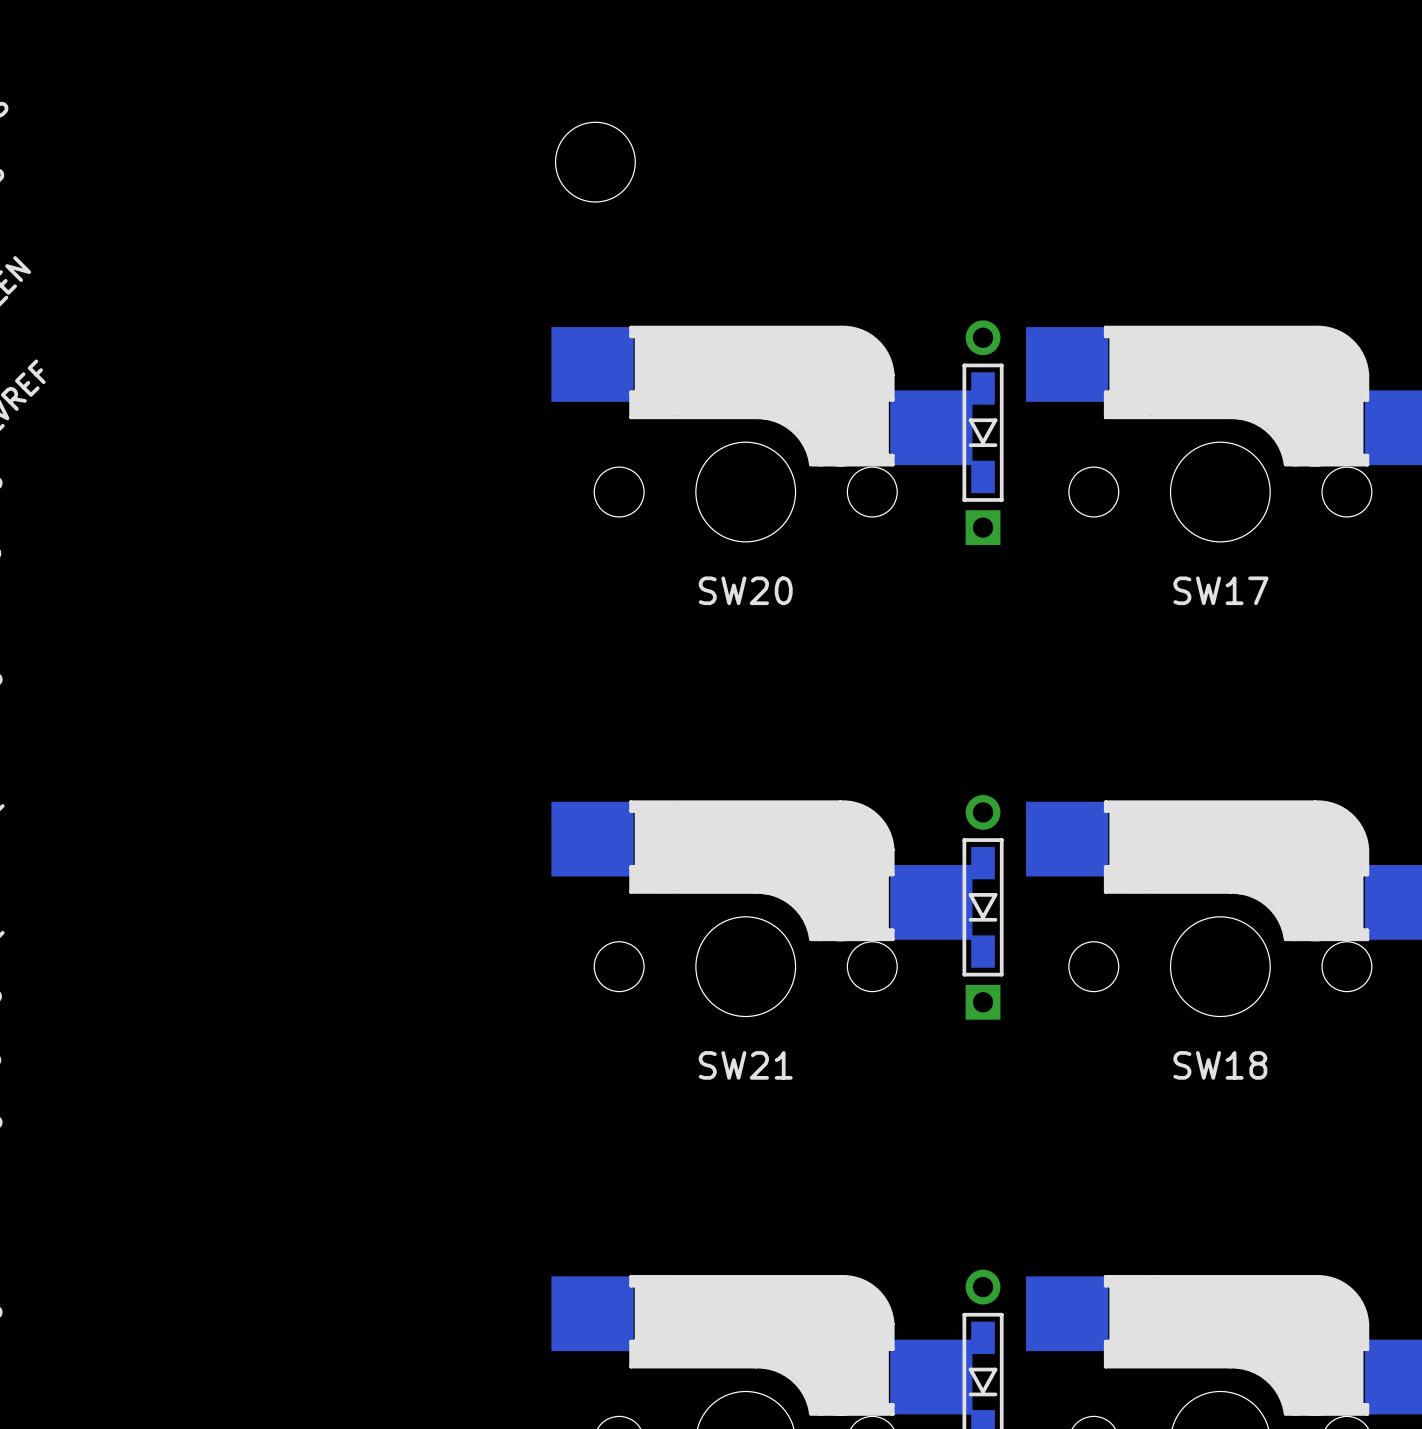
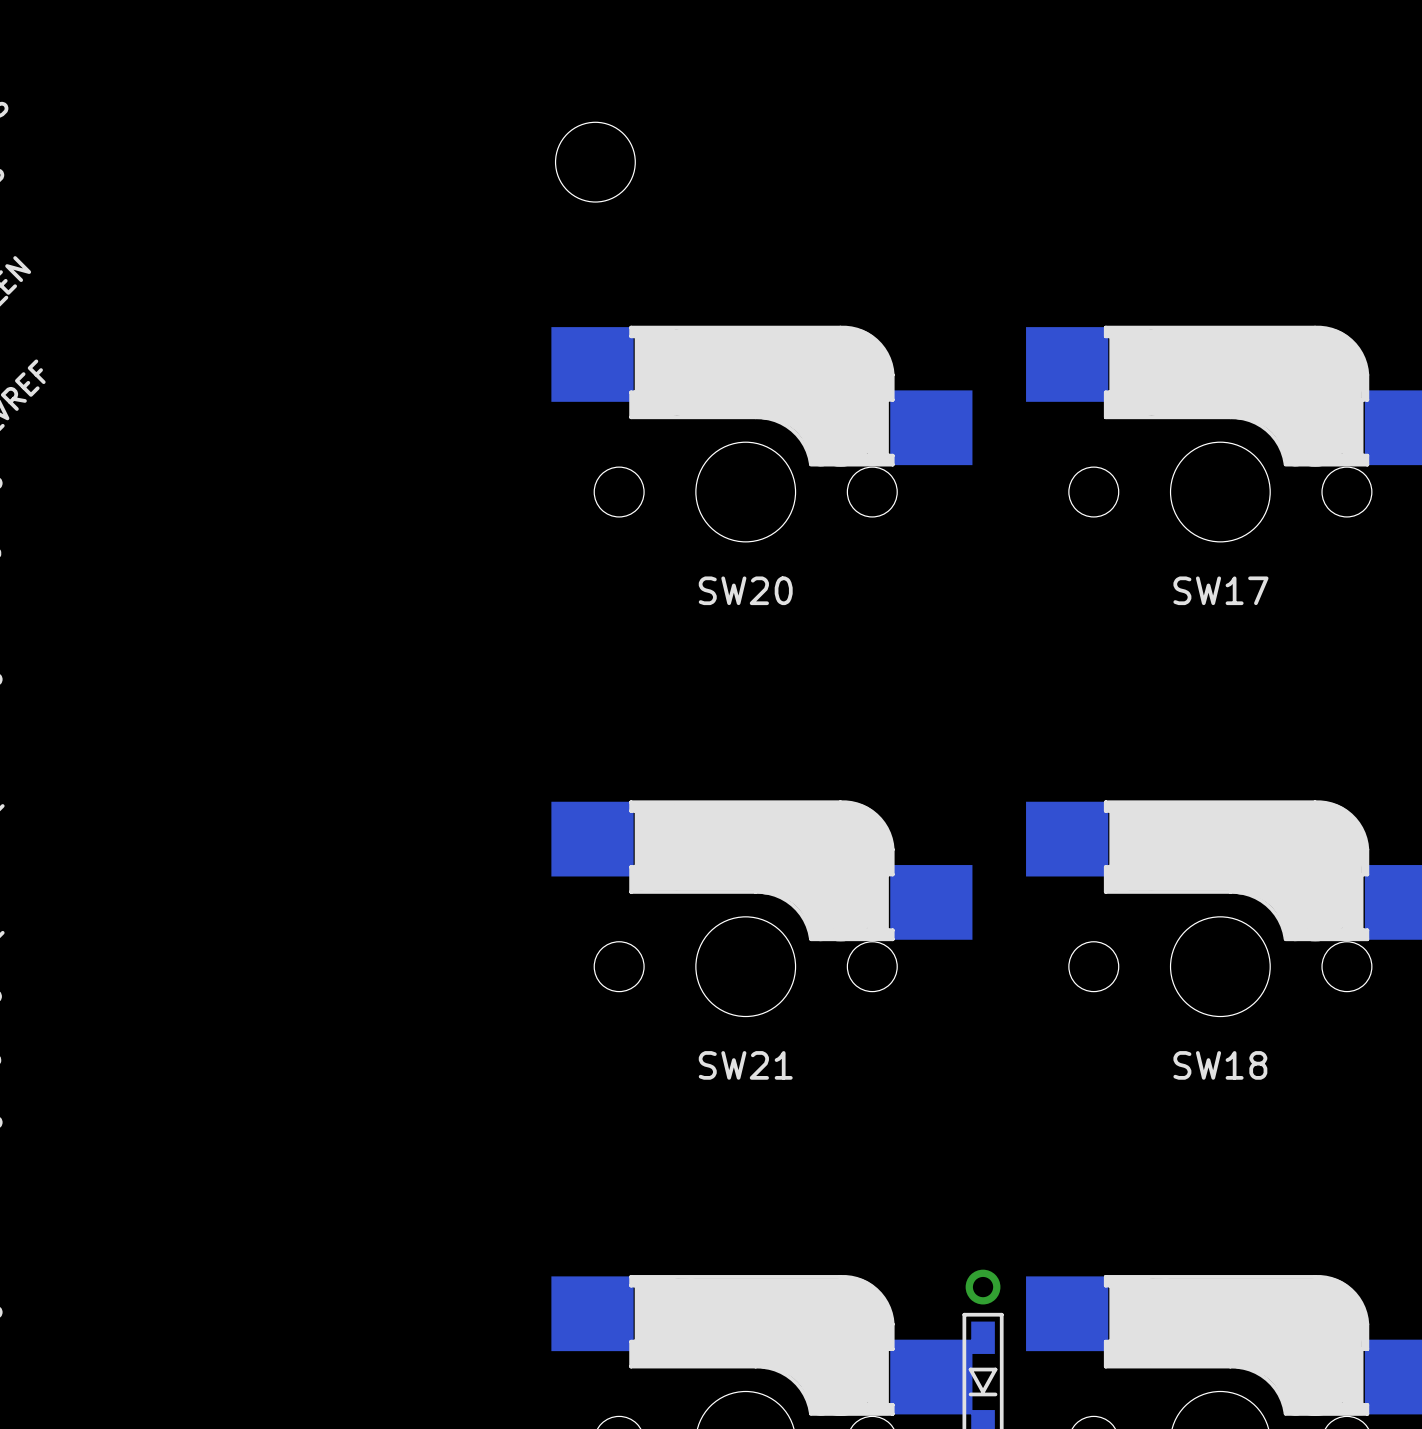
part: (983, 432) -> none
part: (983, 907) -> none

